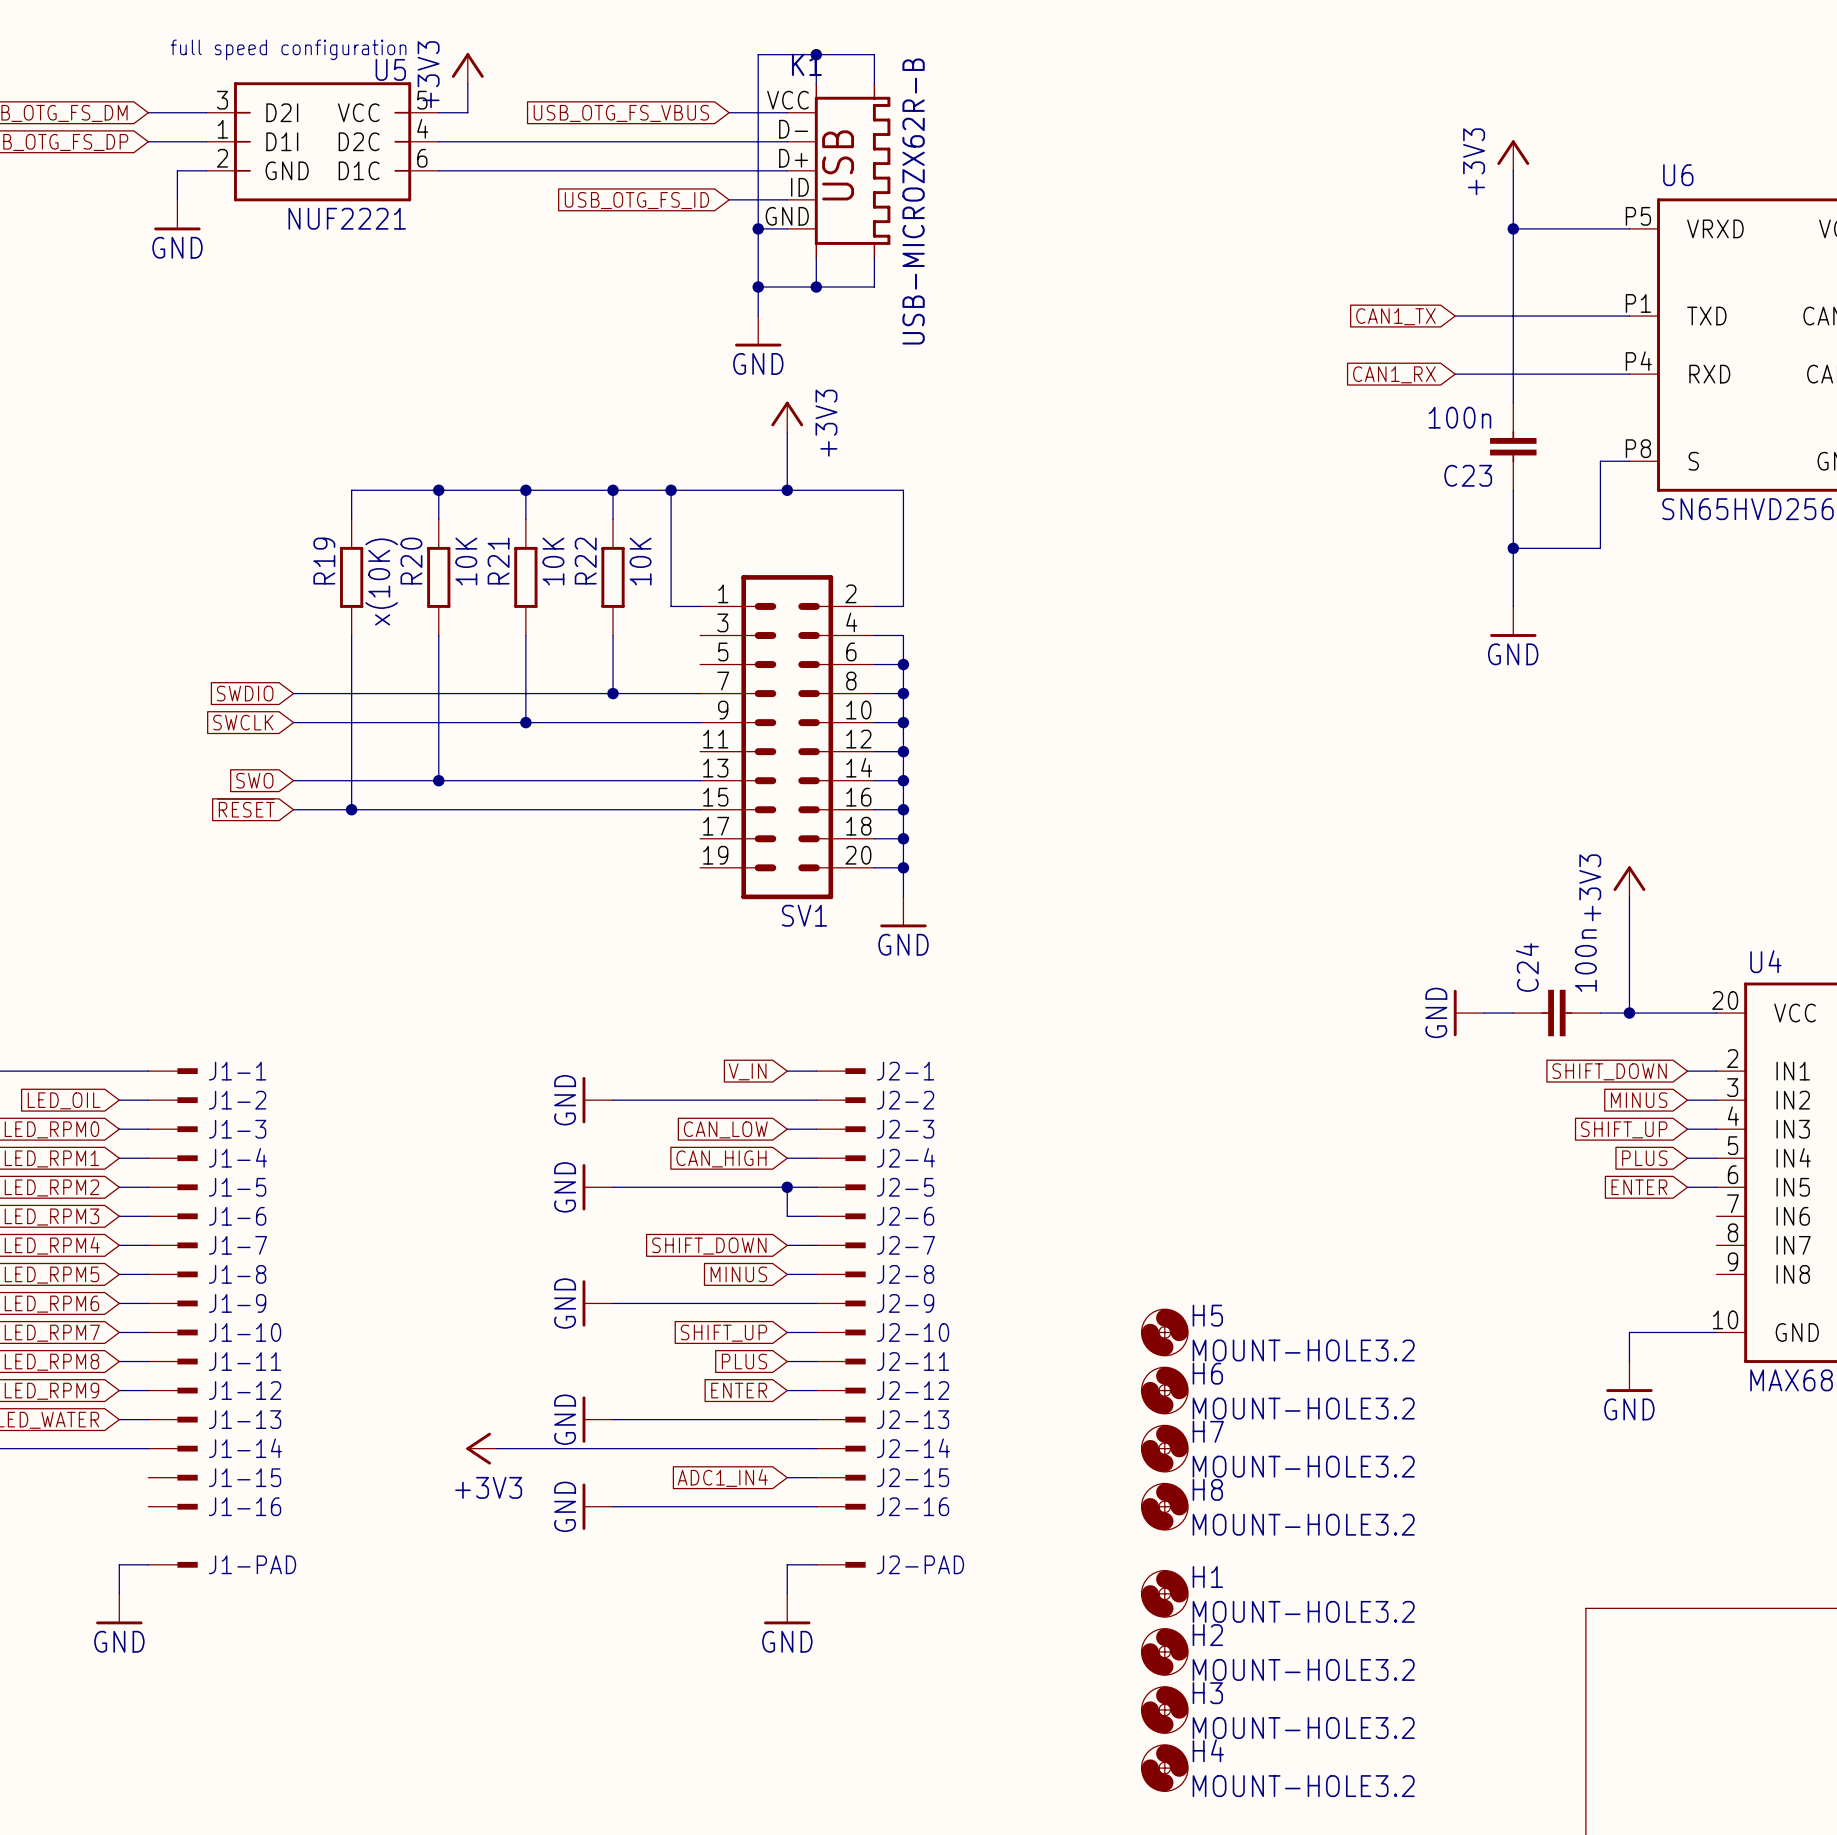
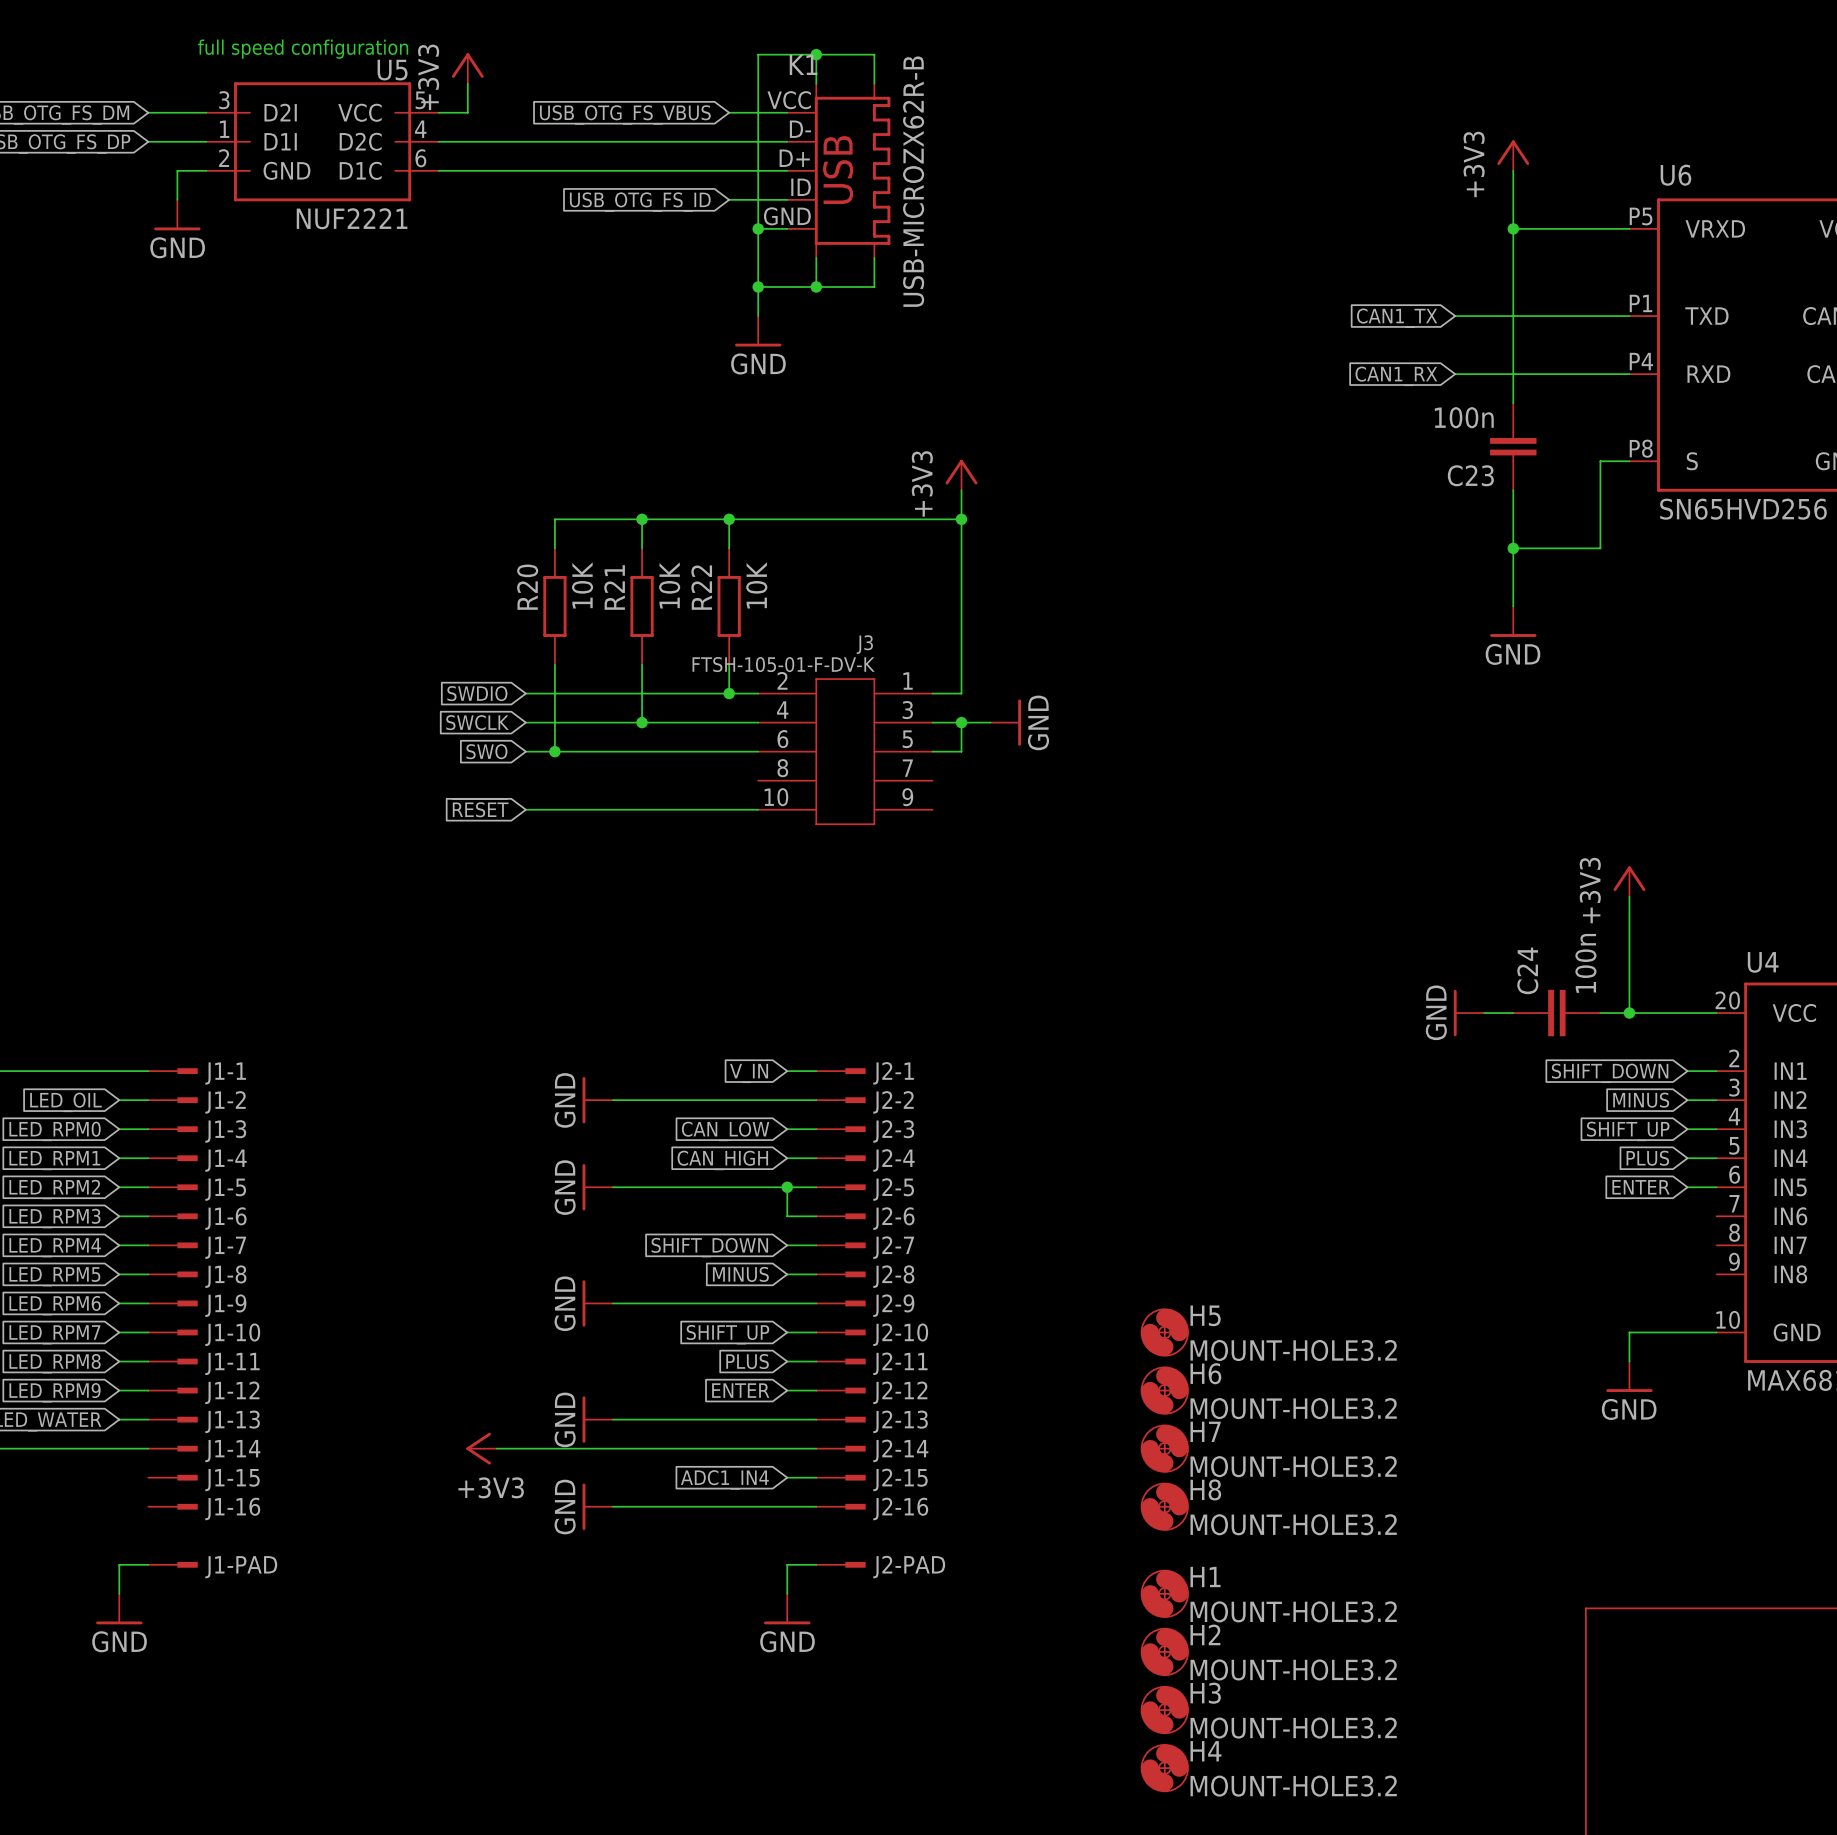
power symbol position: +3V3 (787, 416) -> +3V3 (961, 475)
power symbol text position: +3V3 (826, 423) -> +3V3 (922, 483)
wire: (787, 432) (787, 490) -> none
wire: (438, 490) (438, 519) -> none
junction: (438, 490) -> none
wire: (525, 490) (525, 519) -> (729, 519) (729, 548)
junction: (525, 490) -> none
wire: (613, 490) (613, 519) -> (642, 519) (642, 548)
junction: (613, 490) -> none
wire: (671, 490) (671, 606) (700, 606) -> none
junction: (671, 490) -> none
junction: (787, 490) -> none
wire: none -> (961, 490) (961, 693) (932, 693)
wire: (351, 519) (351, 490) (903, 490) (903, 606) (874, 606) -> none
junction: none -> (642, 519)
junction: none -> (729, 519)
wire: none -> (961, 519) (554, 519) (554, 548)
junction: none -> (961, 519)
R19: x(10K) (351, 577) -> none
R20 position: (438, 577) -> (554, 606)
R21 position: (525, 577) -> (642, 606)
R22 position: (613, 577) -> (729, 606)
wire: (351, 635) (351, 809) -> none
wire: (438, 635) (438, 780) -> none
wire: (525, 635) (525, 722) (293, 722) -> none
wire: (613, 635) (613, 693) -> (642, 664) (642, 722)
wire: (874, 635) (903, 635) (903, 896) -> none
wire: none -> (554, 664) (554, 751)
wire: none -> (729, 664) (729, 693)
wire: (874, 664) (903, 664) -> none
junction: (903, 664) -> none
global label position: SWDIO (245, 693) -> SWDIO (477, 693)
wire: (293, 693) (525, 693) -> (525, 751) (758, 751)
junction: (613, 693) -> none
junction: none -> (729, 693)
junction: (903, 693) -> none
global label position: SWCLK (243, 722) -> SWCLK (477, 722)
junction: (525, 722) -> none
junction: none -> (642, 722)
junction: (903, 722) -> none
wire: none -> (932, 722) (990, 722)
wire: none -> (961, 722) (961, 751) (932, 751)
junction: none -> (961, 722)
SV1: (787, 737) -> none
junction: none -> (554, 751)
J3: none -> FTSH-105-01-F-DV-K (845, 751)
junction: (903, 751) -> none
global label position: SWO (254, 780) -> SWO (486, 751)
wire: (293, 780) (700, 780) -> none
junction: (438, 780) -> none
junction: (903, 780) -> none
global label position: ~{RESET} (245, 808) -> ~{RESET} (480, 808)
wire: (293, 809) (525, 809) -> none
junction: (351, 809) -> none
junction: (903, 809) -> none
wire: (874, 838) (903, 838) -> none
junction: (903, 838) -> none
wire: (874, 867) (903, 867) -> none
junction: (903, 867) -> none
power symbol position: GND (903, 912) -> GND (1005, 722)
power symbol rotation: 0° (903, 925) -> 90° counterclockwise (1019, 722)

